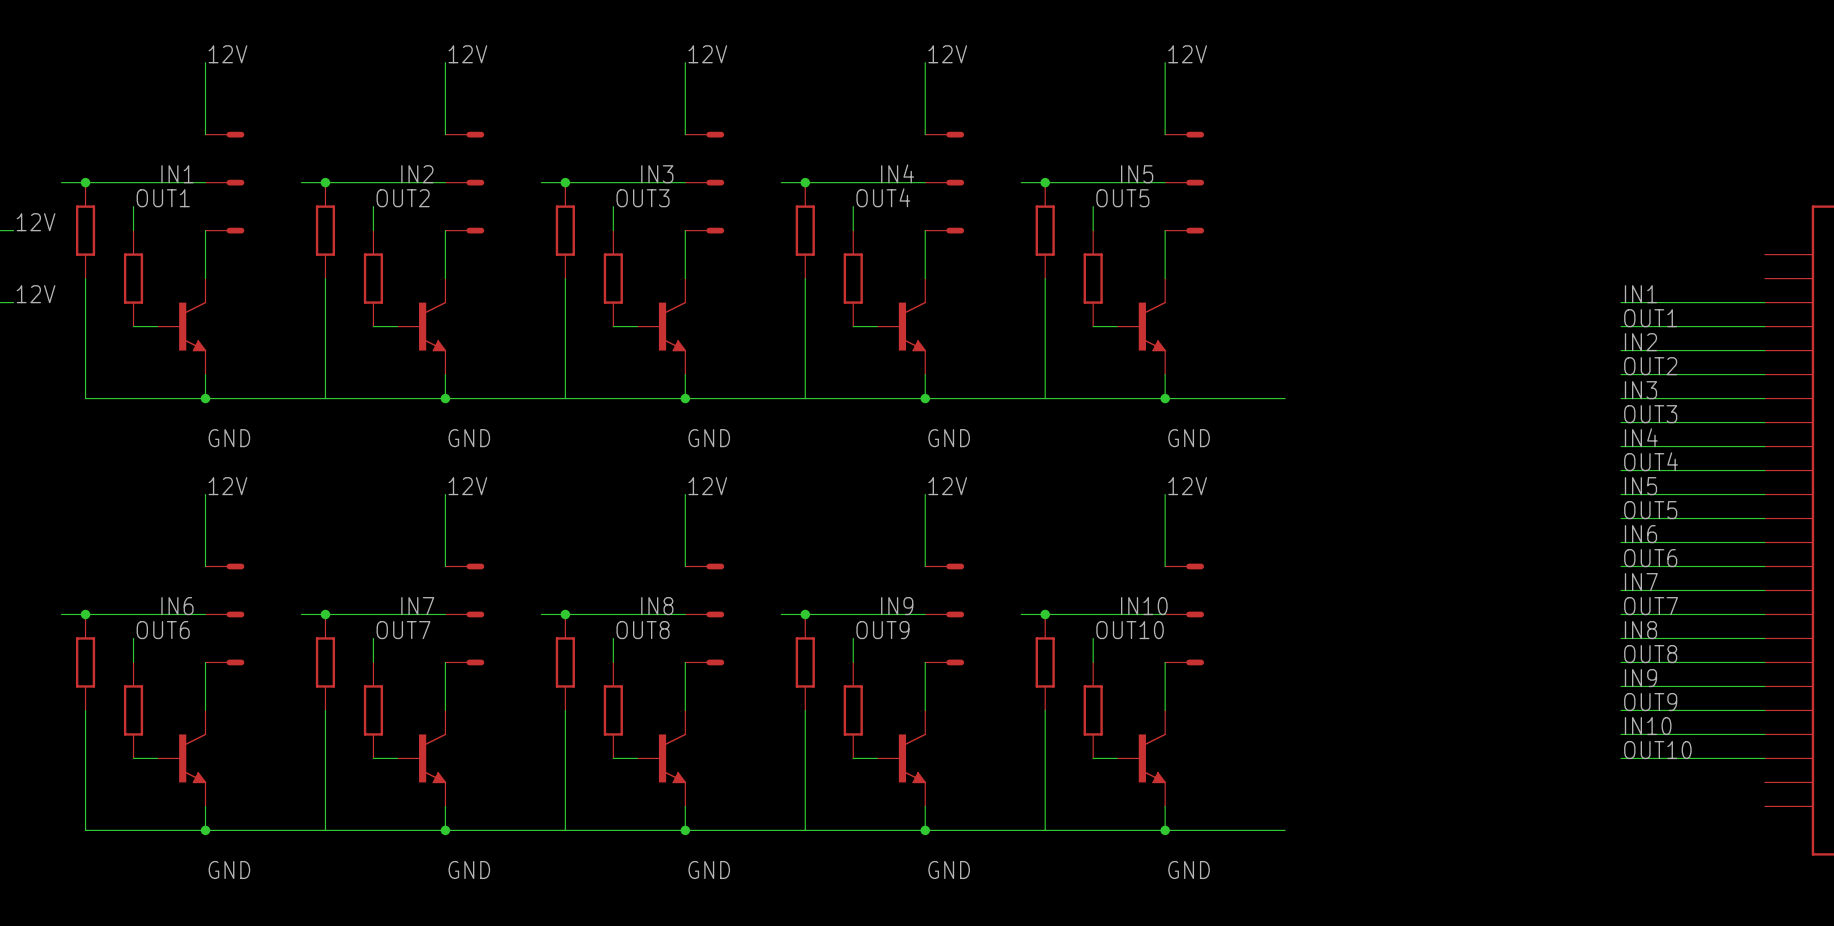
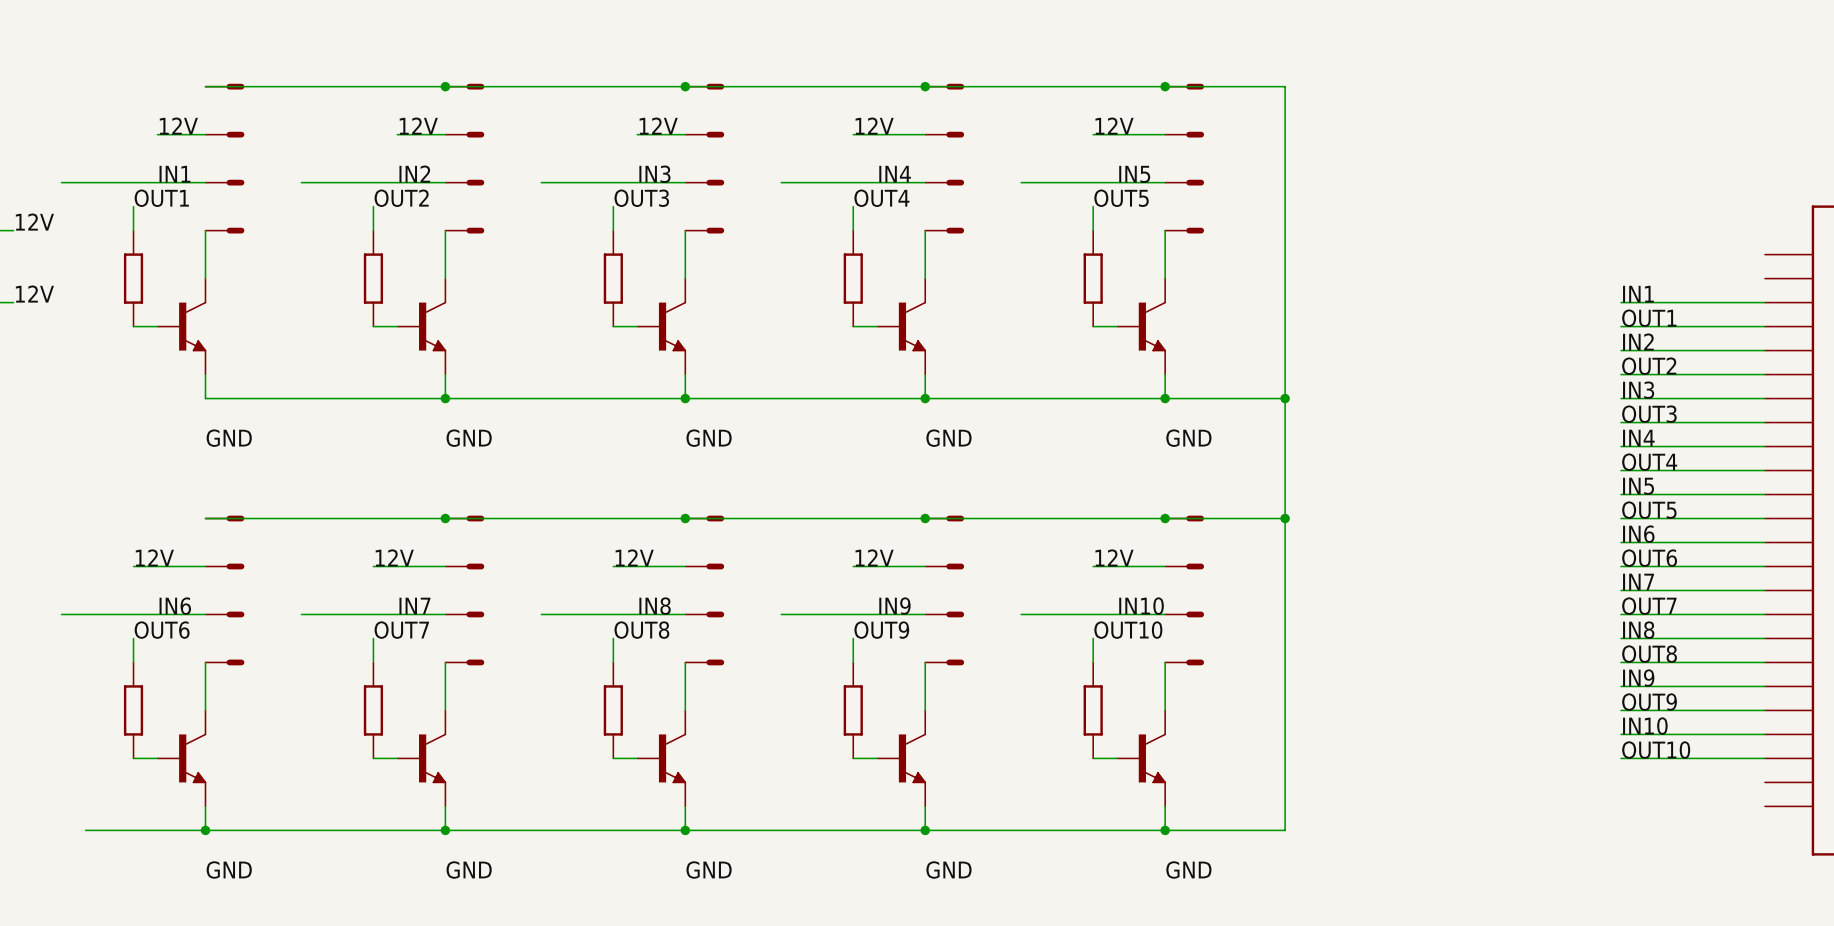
label position: 12V (227, 54) -> 12V (178, 126)
label position: 12V (467, 54) -> 12V (418, 126)
label position: 12V (707, 54) -> 12V (658, 126)
label: 12V (947, 54) -> none
label: 12V (1187, 54) -> none
wire: (205, 62) (205, 134) -> (157, 134) (205, 134)
wire: (445, 62) (445, 134) -> (397, 134) (445, 134)
wire: (685, 62) (685, 134) -> (637, 134) (685, 134)
wire: (925, 62) (925, 134) -> (853, 134) (925, 134)
wire: (1165, 62) (1165, 134) -> (1093, 134) (1165, 134)
wire: none -> (205, 86) (1285, 86) (1285, 830)
part: none -> (224, 86)
junction: none -> (445, 86)
part: none -> (464, 86)
junction: none -> (685, 86)
part: none -> (704, 86)
junction: none -> (925, 86)
part: none -> (944, 86)
junction: none -> (1165, 86)
part: none -> (1184, 86)
label: none -> 12V (874, 126)
label: none -> 12V (1114, 126)
junction: (85, 182) -> none
junction: (325, 182) -> none
junction: (565, 182) -> none
junction: (805, 182) -> none
junction: (1045, 182) -> none
part: (85, 230) -> none
part: (325, 230) -> none
part: (565, 230) -> none
part: (805, 230) -> none
part: (1045, 230) -> none
wire: (85, 278) (85, 398) (205, 398) -> none
wire: (325, 278) (325, 398) -> none
wire: (565, 278) (565, 398) -> none
wire: (805, 278) (805, 398) -> none
wire: (1045, 278) (1045, 398) -> none
junction: (205, 398) -> none
junction: none -> (1285, 398)
label: 12V (227, 486) -> none
label: 12V (467, 486) -> none
label: 12V (707, 486) -> none
label: 12V (947, 486) -> none
label: 12V (1187, 486) -> none
wire: (205, 494) (205, 566) -> (133, 566) (205, 566)
wire: (445, 494) (445, 566) -> (373, 566) (445, 566)
wire: (685, 494) (685, 566) -> (613, 566) (685, 566)
wire: (925, 494) (925, 566) -> (853, 566) (925, 566)
wire: (1165, 494) (1165, 566) -> (1093, 566) (1165, 566)
wire: none -> (205, 518) (1285, 518)
part: none -> (224, 518)
junction: none -> (445, 518)
part: none -> (464, 518)
junction: none -> (685, 518)
part: none -> (704, 518)
junction: none -> (925, 518)
part: none -> (944, 518)
junction: none -> (1165, 518)
part: none -> (1184, 518)
junction: none -> (1285, 518)
label: none -> 12V (154, 557)
label: none -> 12V (394, 557)
label: none -> 12V (634, 557)
label: none -> 12V (874, 557)
label: none -> 12V (1114, 557)
junction: (85, 614) -> none
junction: (325, 614) -> none
junction: (565, 614) -> none
junction: (805, 614) -> none
junction: (1045, 614) -> none
part: (85, 662) -> none
part: (325, 662) -> none
part: (565, 662) -> none
part: (805, 662) -> none
part: (1045, 662) -> none
wire: (85, 710) (85, 830) -> none
wire: (325, 710) (325, 830) -> none
wire: (565, 710) (565, 830) -> none
wire: (805, 710) (805, 830) -> none
wire: (1045, 710) (1045, 830) -> none

